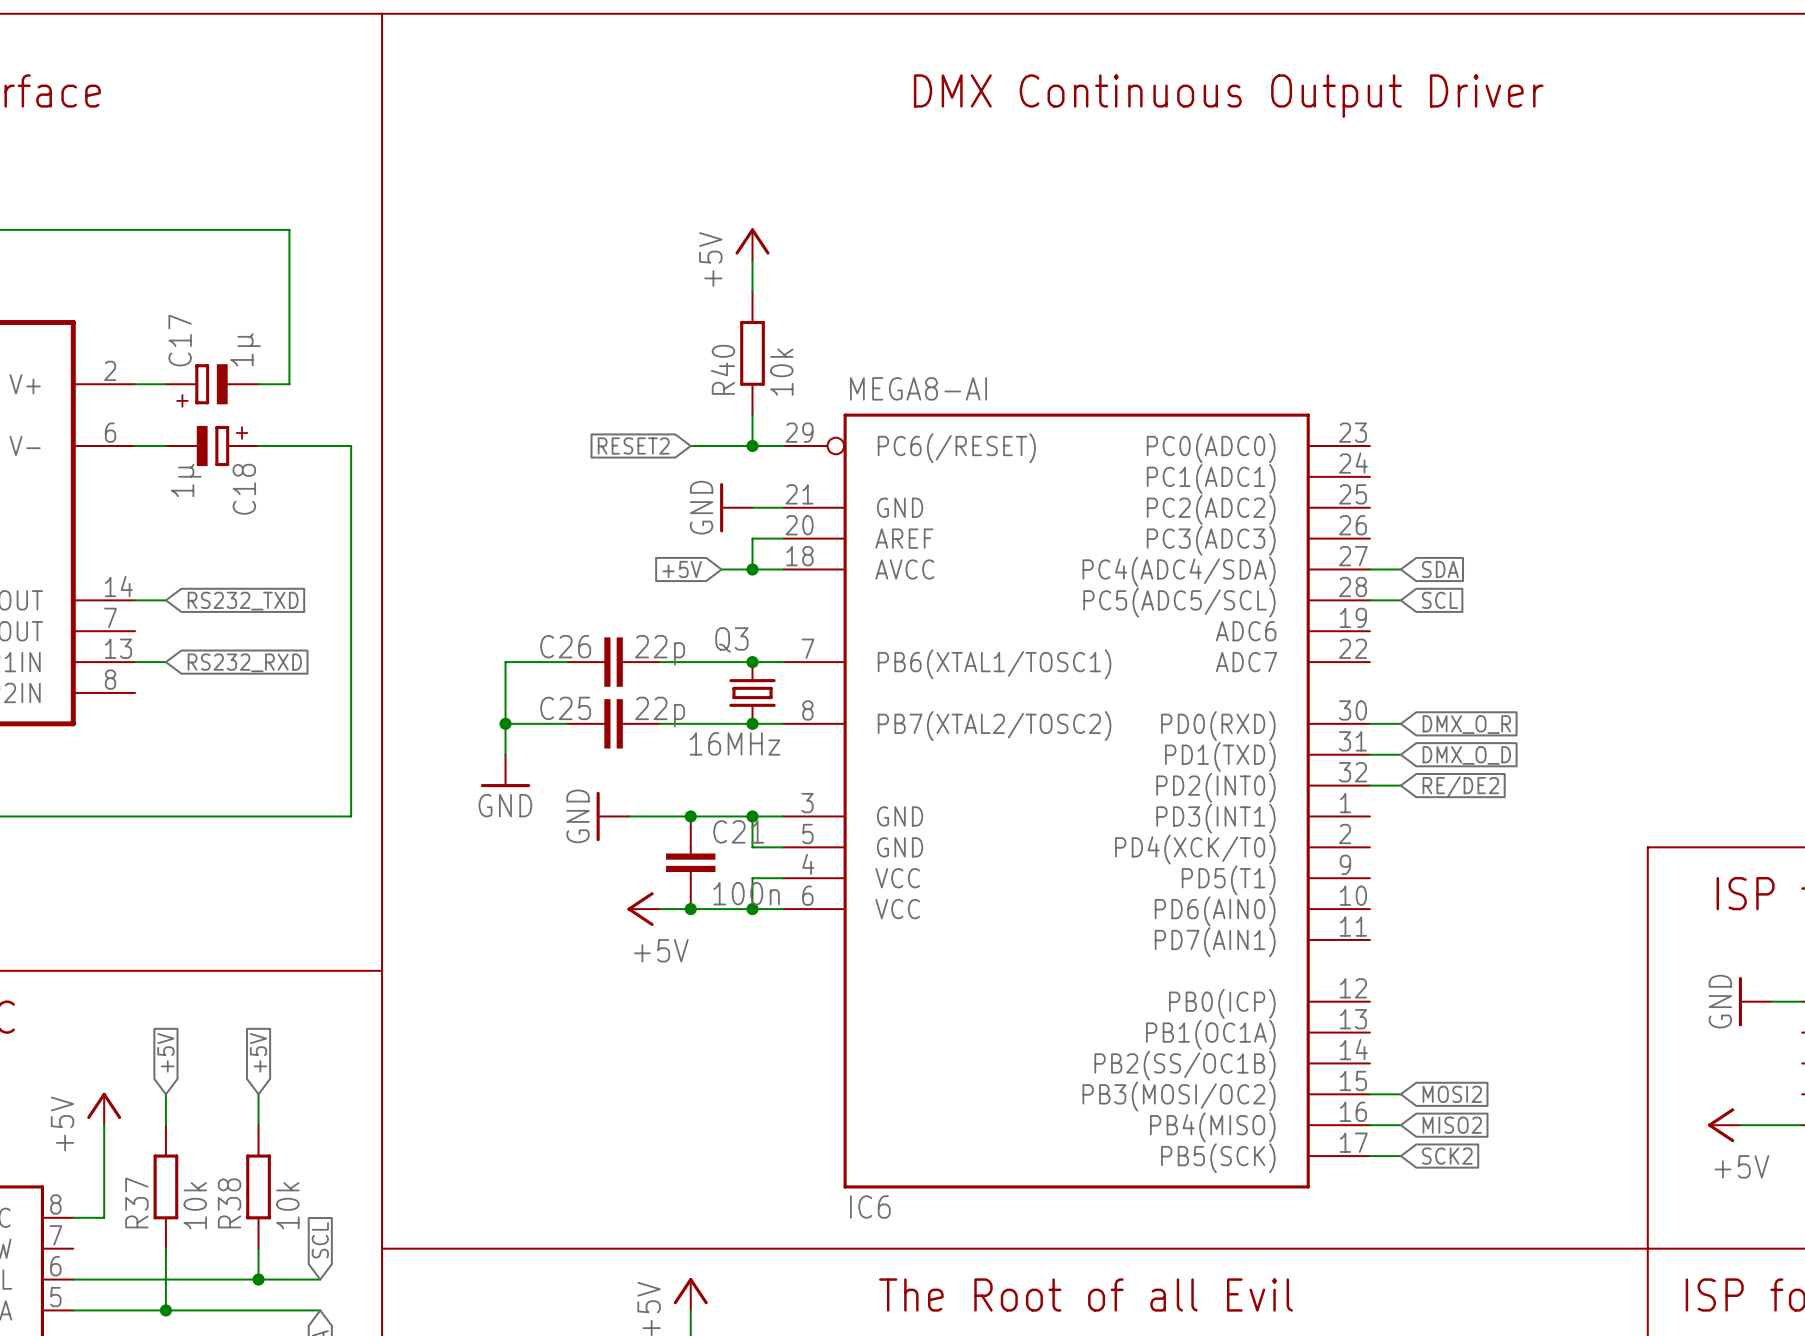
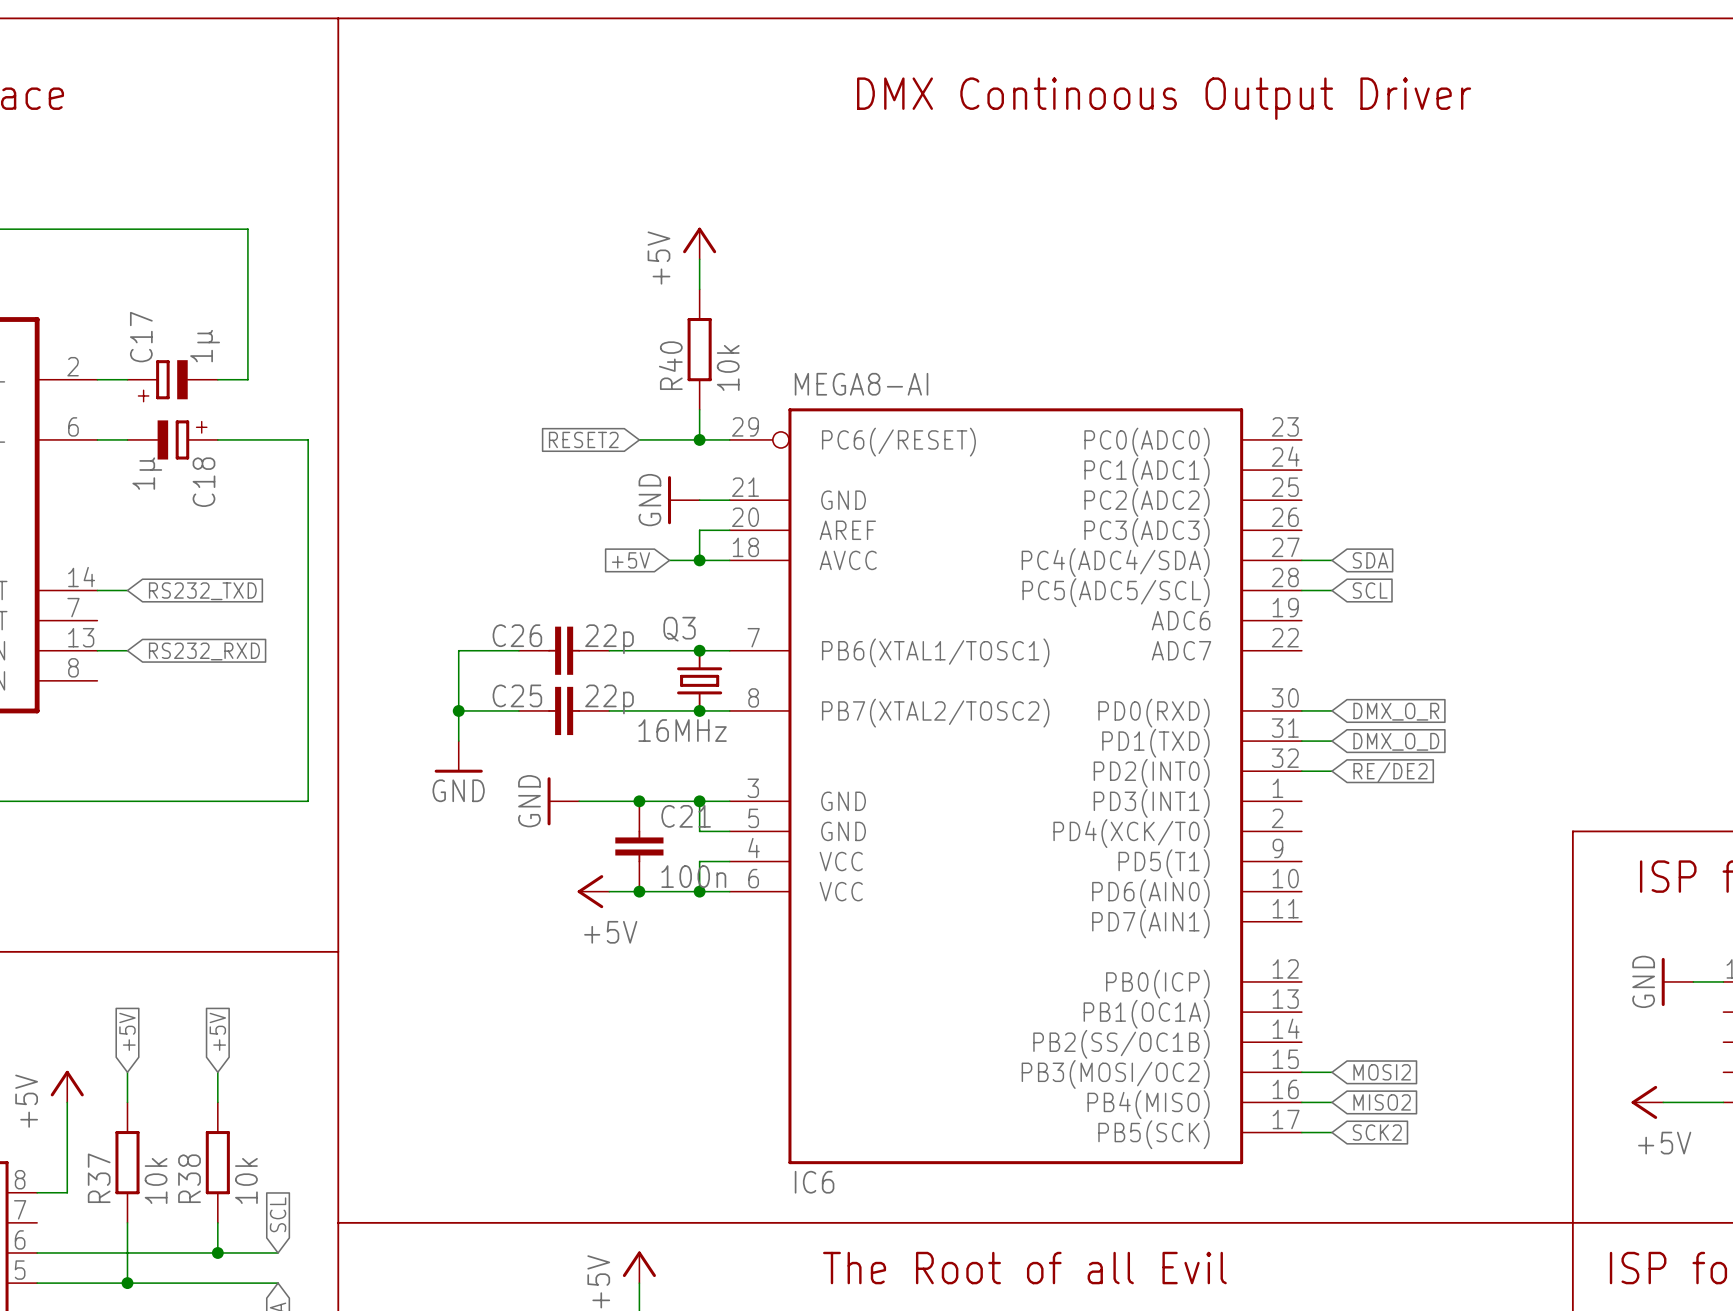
text: DMX Continuous Output Driver (1228, 96) -> DMX Continoous Output Driver (1164, 98)

